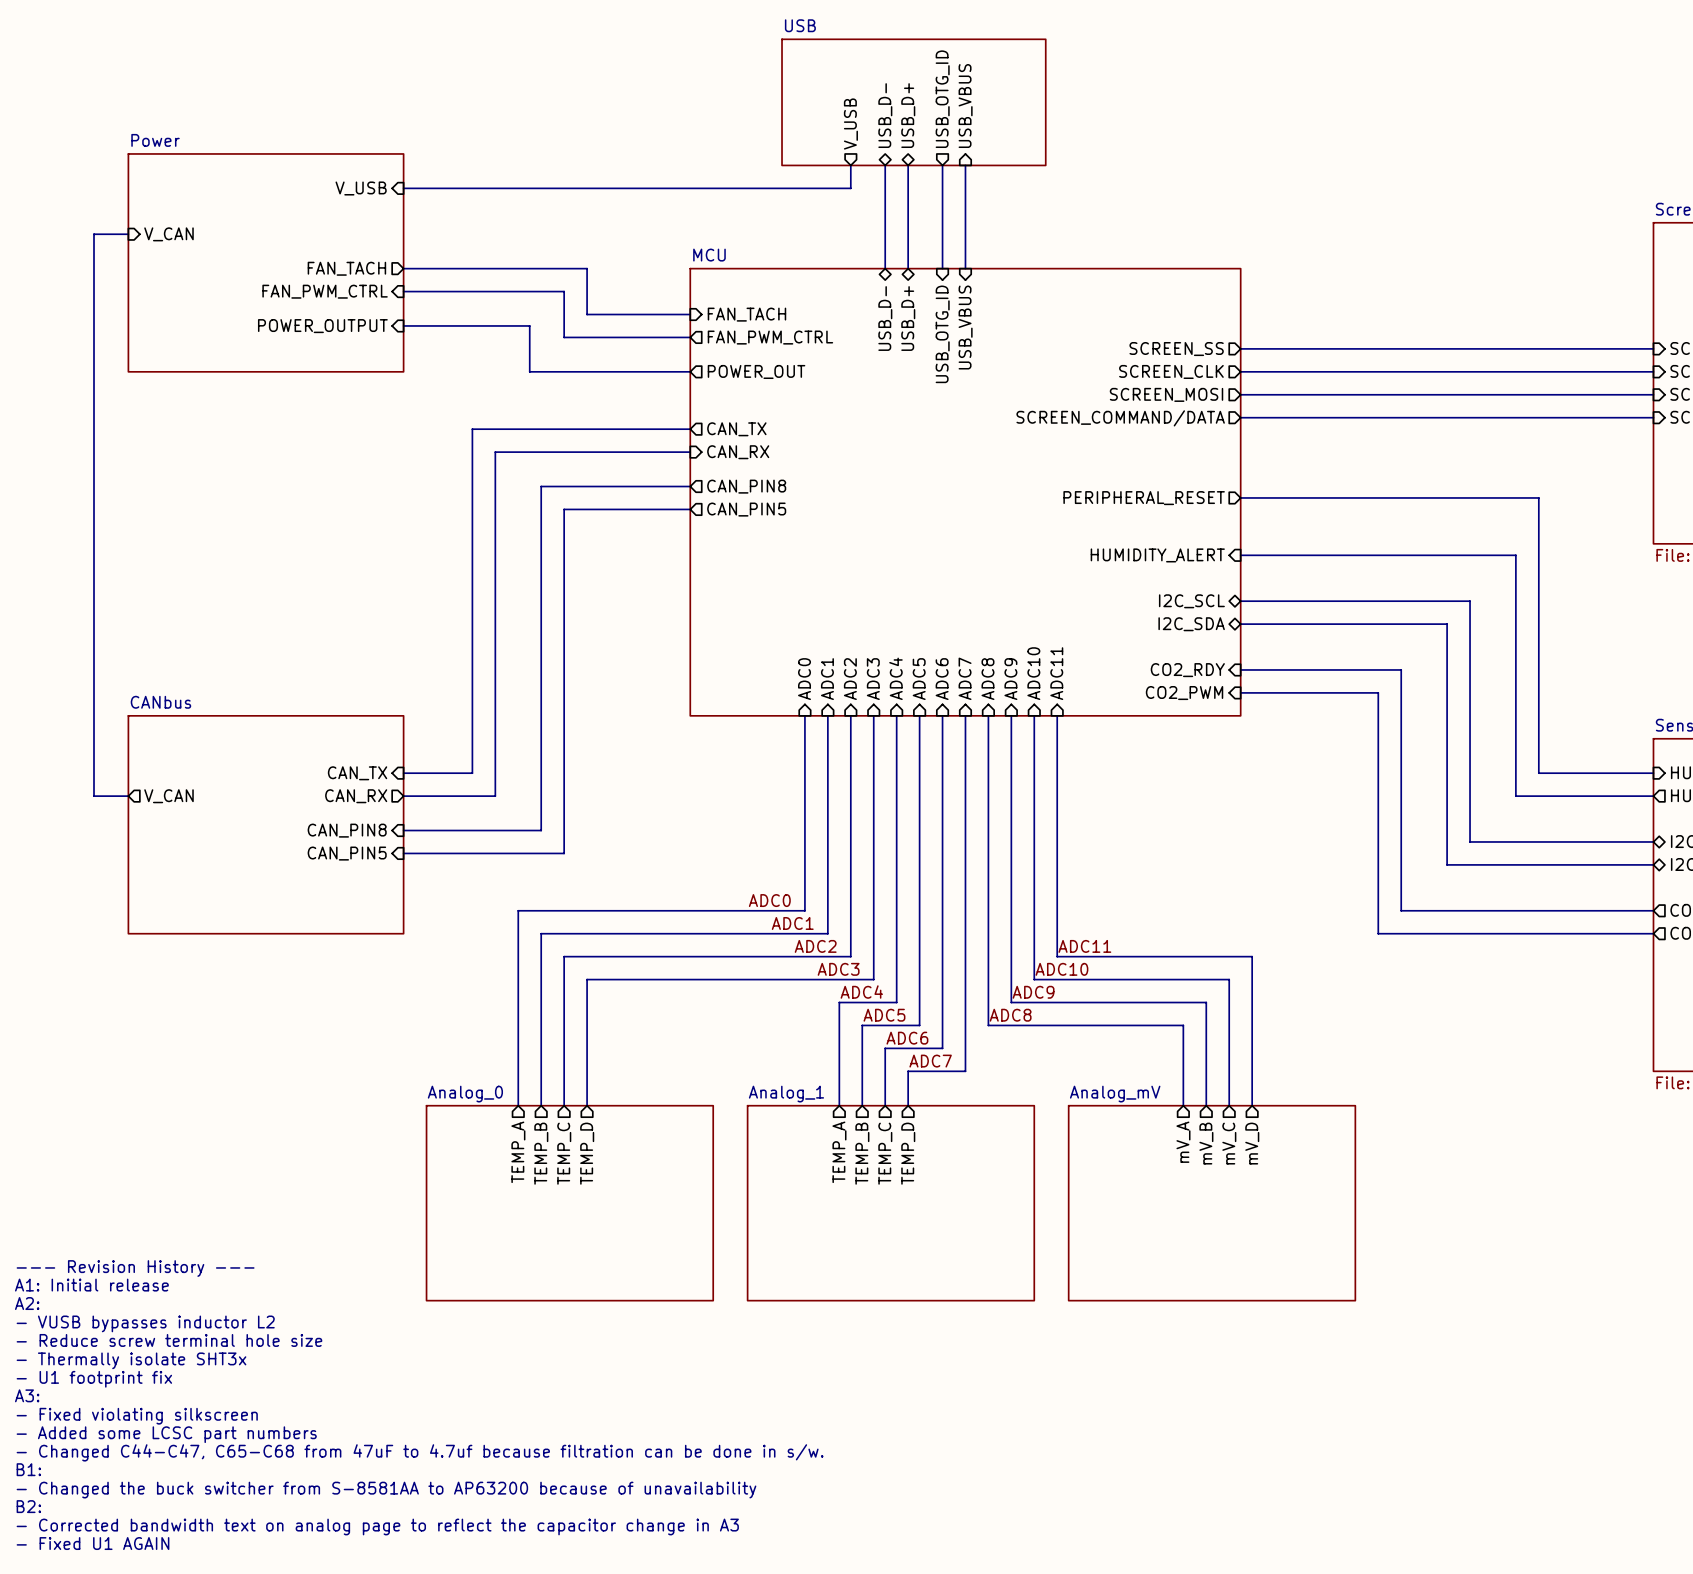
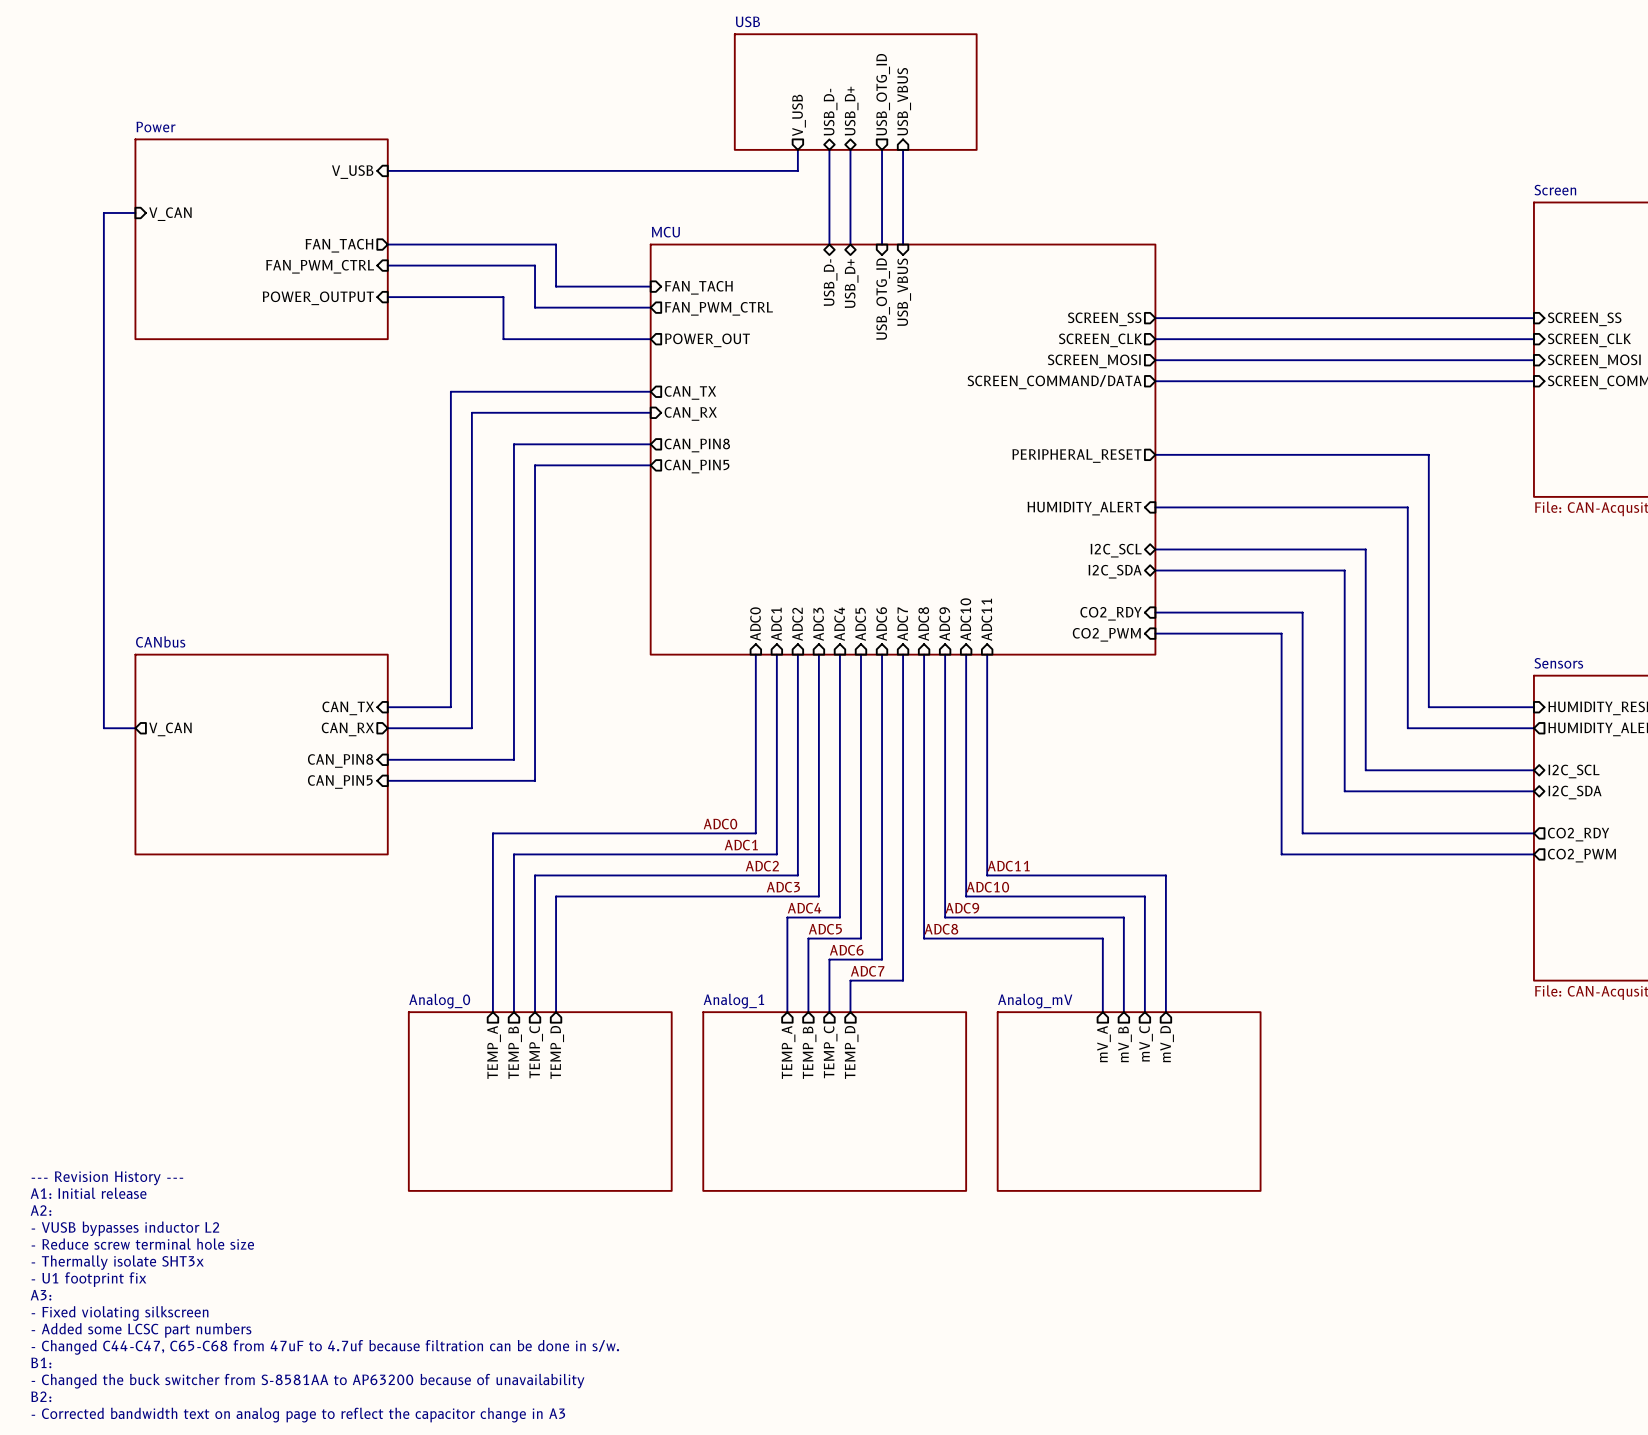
text: --- Revision History --- (135, 1268) -> none
text: A1: Initial release (91, 1285) -> --- Revision History --- (107, 1178)
text: A2: (27, 1303) -> A1: Initial release (88, 1193)
text: - VUSB bypasses inductor L2 (145, 1323) -> A2: (41, 1210)
text: - Reduce screw terminal hole size (169, 1340) -> - VUSB bypasses inductor L2 (125, 1228)
text: - Thermally isolate SHT3x (131, 1360) -> - Reduce screw terminal hole size (142, 1244)
text: - U1 footprint fix (94, 1379) -> - Thermally isolate SHT3x (117, 1262)
text: A3: (27, 1395) -> - U1 footprint fix (88, 1279)
text: - Fixed violating silkscreen (137, 1416) -> A3: (41, 1295)
text: - Added some LCSC part numbers (166, 1434) -> - Fixed violating silkscreen (120, 1313)
text: - Changed C44-C47, C65-C68 from 47uF to 4.7uf because filtration can be done in s/w. (420, 1452) -> - Added some LCSC part numbers (141, 1330)
text: B1: (28, 1469) -> - Changed C44-C47, C65-C68 from 47uF to 4.7uf because filtration can be done in s/w. (325, 1347)
text: - Changed the buck switcher from S-8581AA to AP63200 because of unavailability (386, 1490) -> B1: (41, 1362)
text: B2: (28, 1506) -> - Changed the buck switcher from S-8581AA to AP63200 because of unavailability (308, 1381)
text: - Corrected bandwidth text on analog page to reflect the capacitor change in A3 (377, 1526) -> B2: (41, 1396)
text: - Fixed U1 AGAIN (92, 1543) -> - Corrected bandwidth text on analog page to reflect the capacitor change in A3 (298, 1415)

